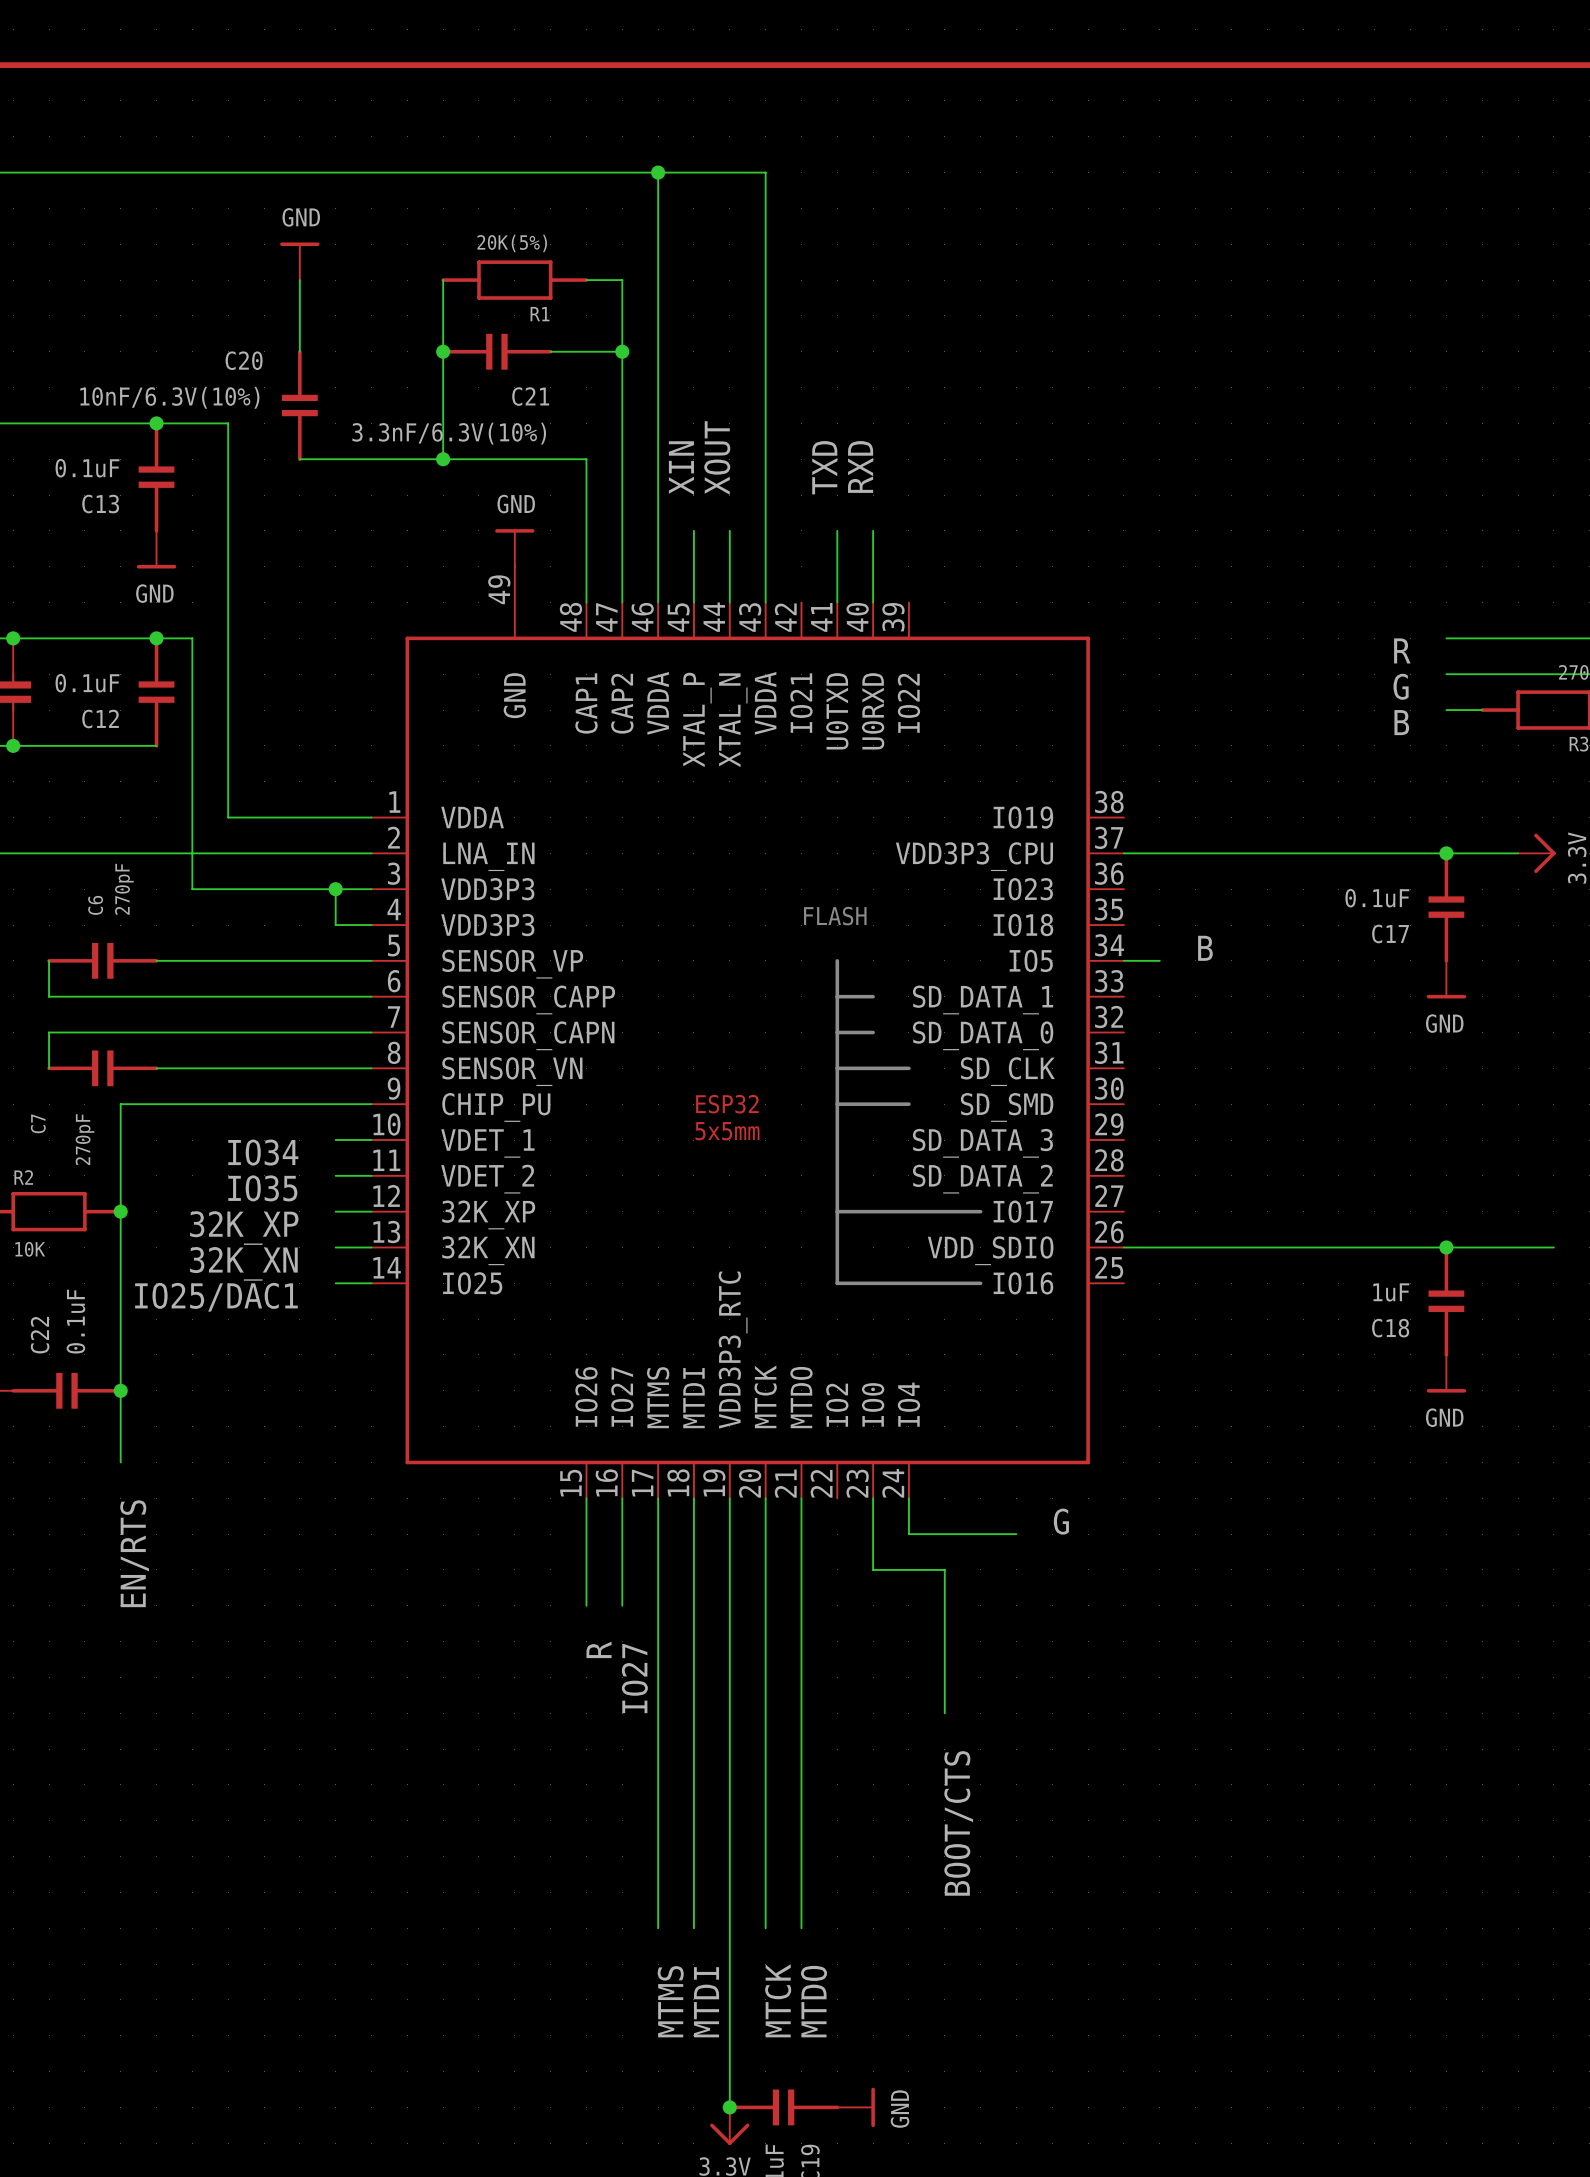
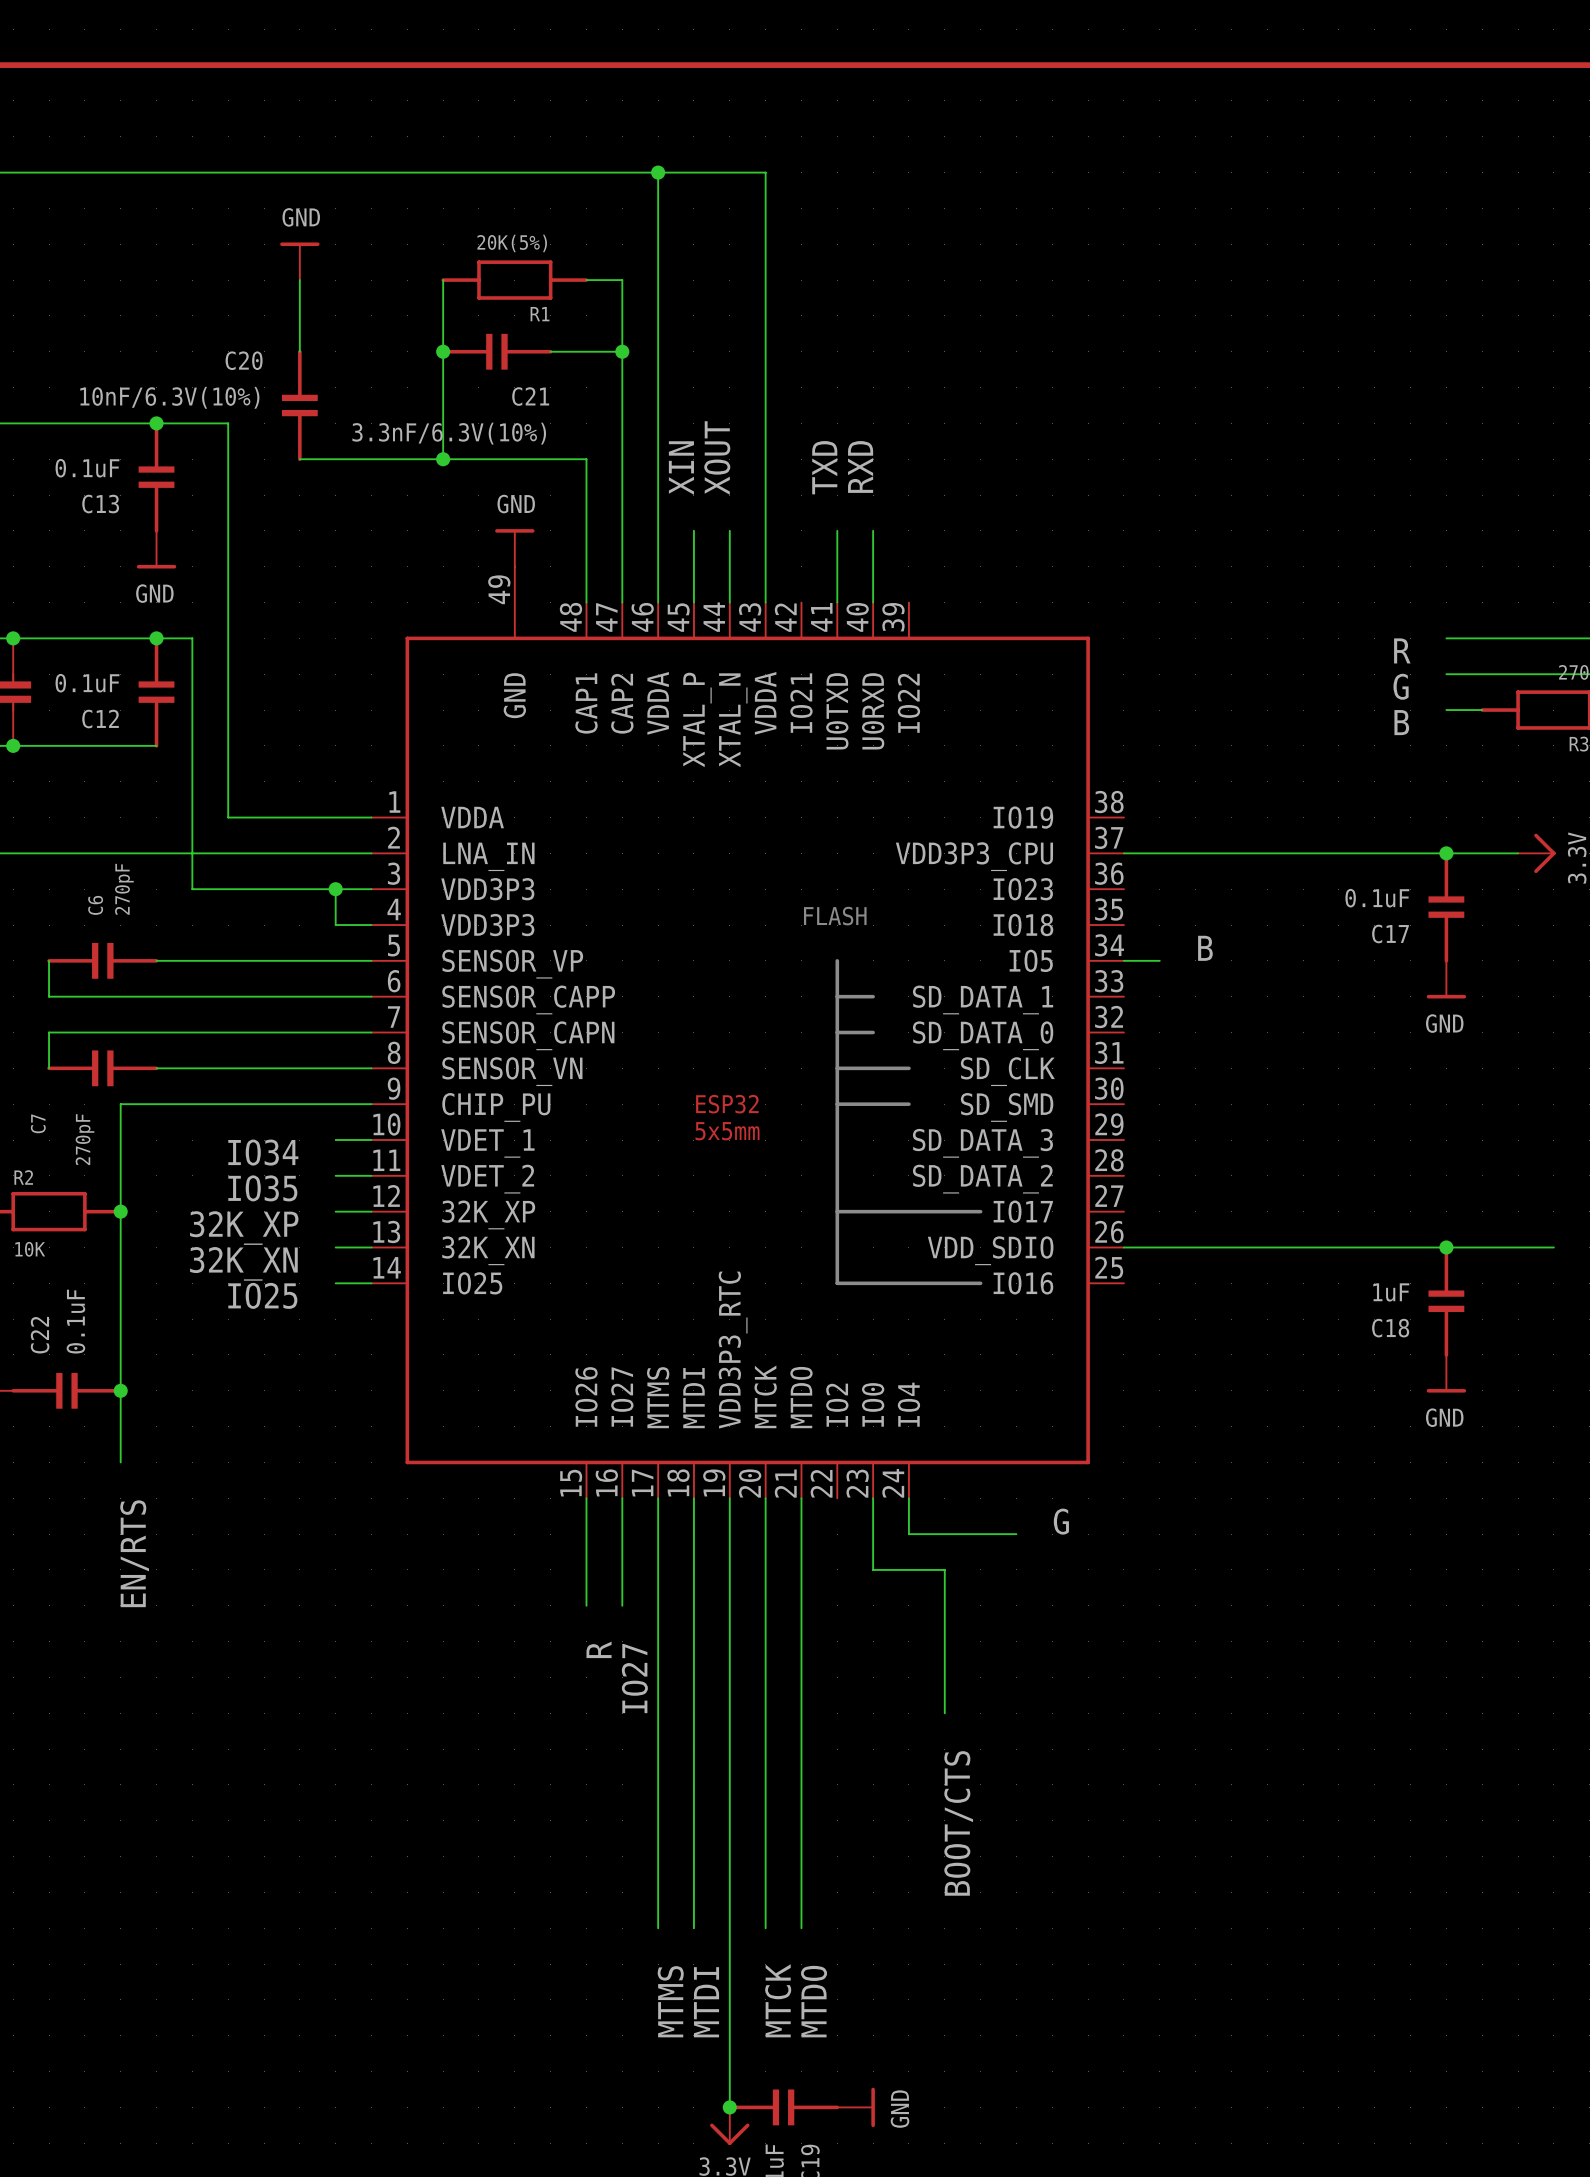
label: IO25/DAC1 (216, 1297) -> IO25 (262, 1295)

